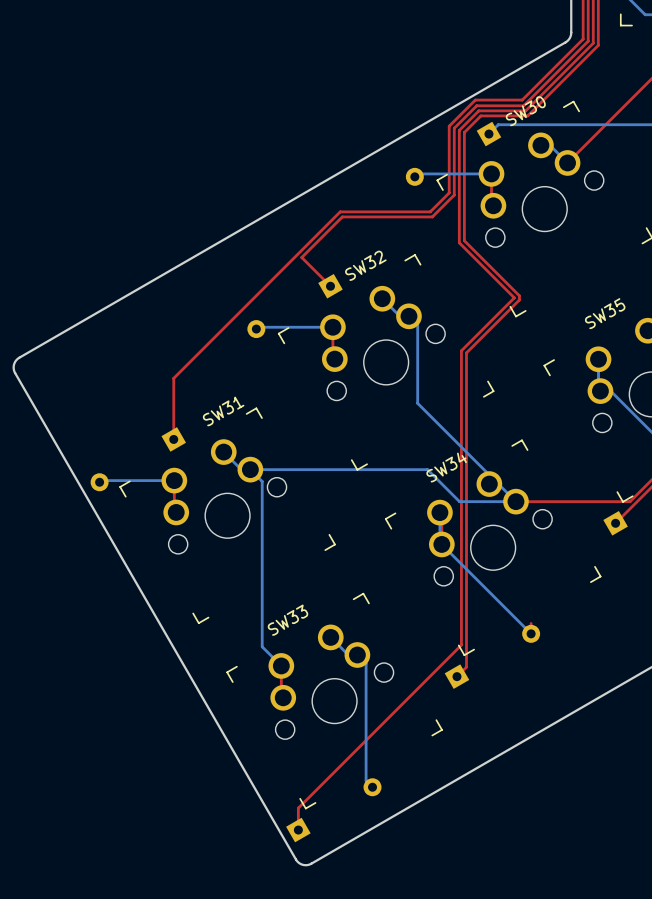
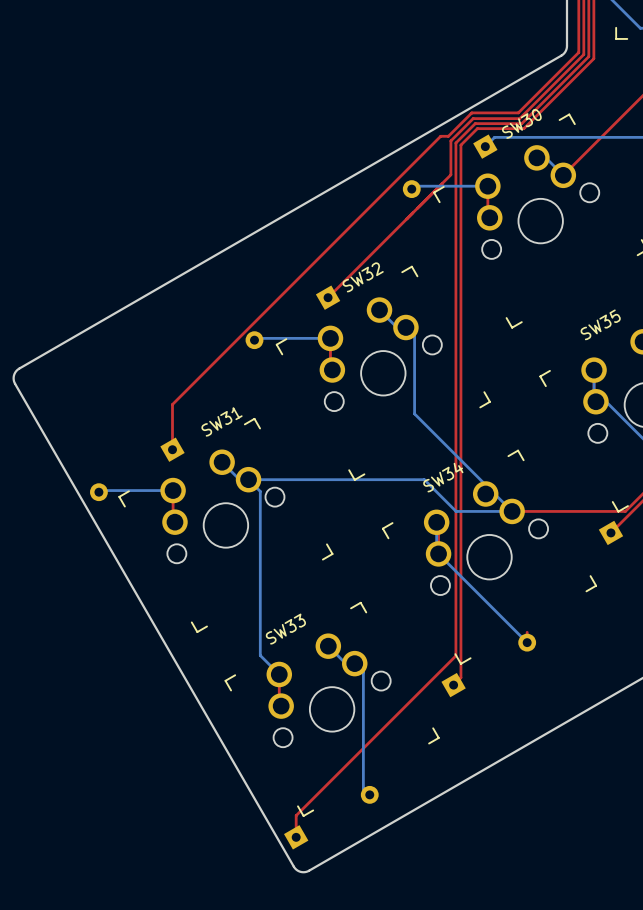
top track: (451, 123) (449, 126) (449, 192) (430, 211) (340, 211) (173, 378) (173, 393) -> (448, 136) (440, 136) (172, 404)
top track: (454, 162) (454, 195) (432, 216) (342, 216) (301, 257) (330, 286) -> (450, 174) (328, 297)
top track: (464, 240) (519, 295) (519, 299) (466, 352) (466, 667) (464, 669) -> (460, 252) (460, 677)
top track: (459, 242) (514, 297) (461, 350) (461, 645) (459, 647) -> (455, 254) (455, 655)

